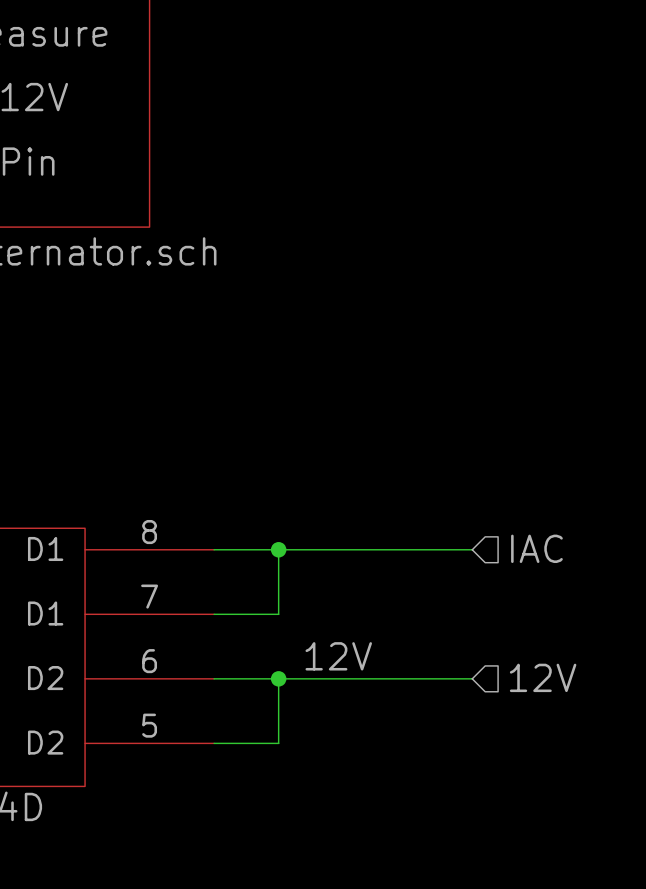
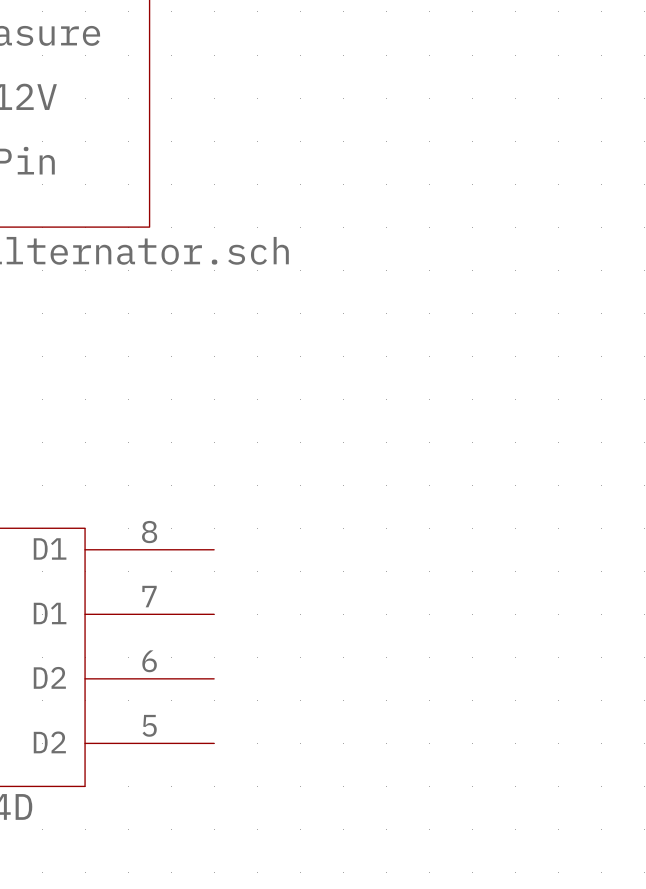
hierarchical label: IAC (536, 548) -> none
wire: (214, 549) (472, 549) -> none
wire: (278, 549) (278, 614) (214, 614) -> none
junction: (278, 549) -> none
label: 12V (338, 656) -> none
hierarchical label: 12V (543, 677) -> none
wire: (214, 678) (472, 678) -> none
wire: (278, 678) (278, 743) (214, 743) -> none
junction: (278, 678) -> none

